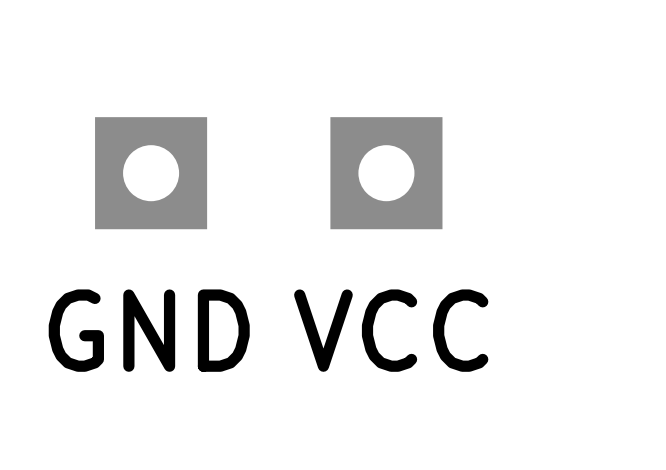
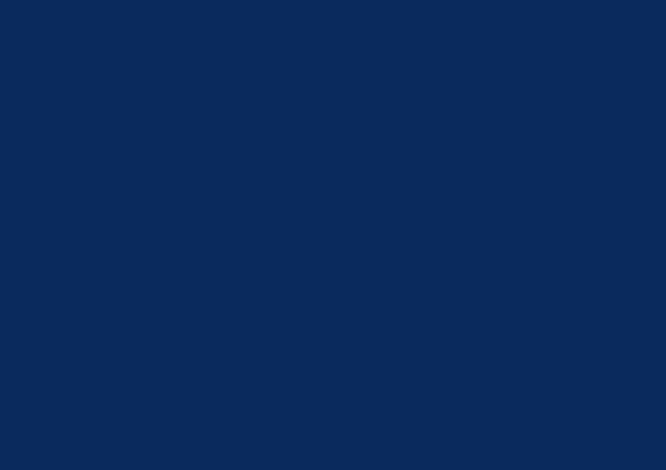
part: (151, 173) -> none
part: (386, 173) -> none
text: GND (149, 330) -> none
text: VCC (391, 330) -> none

